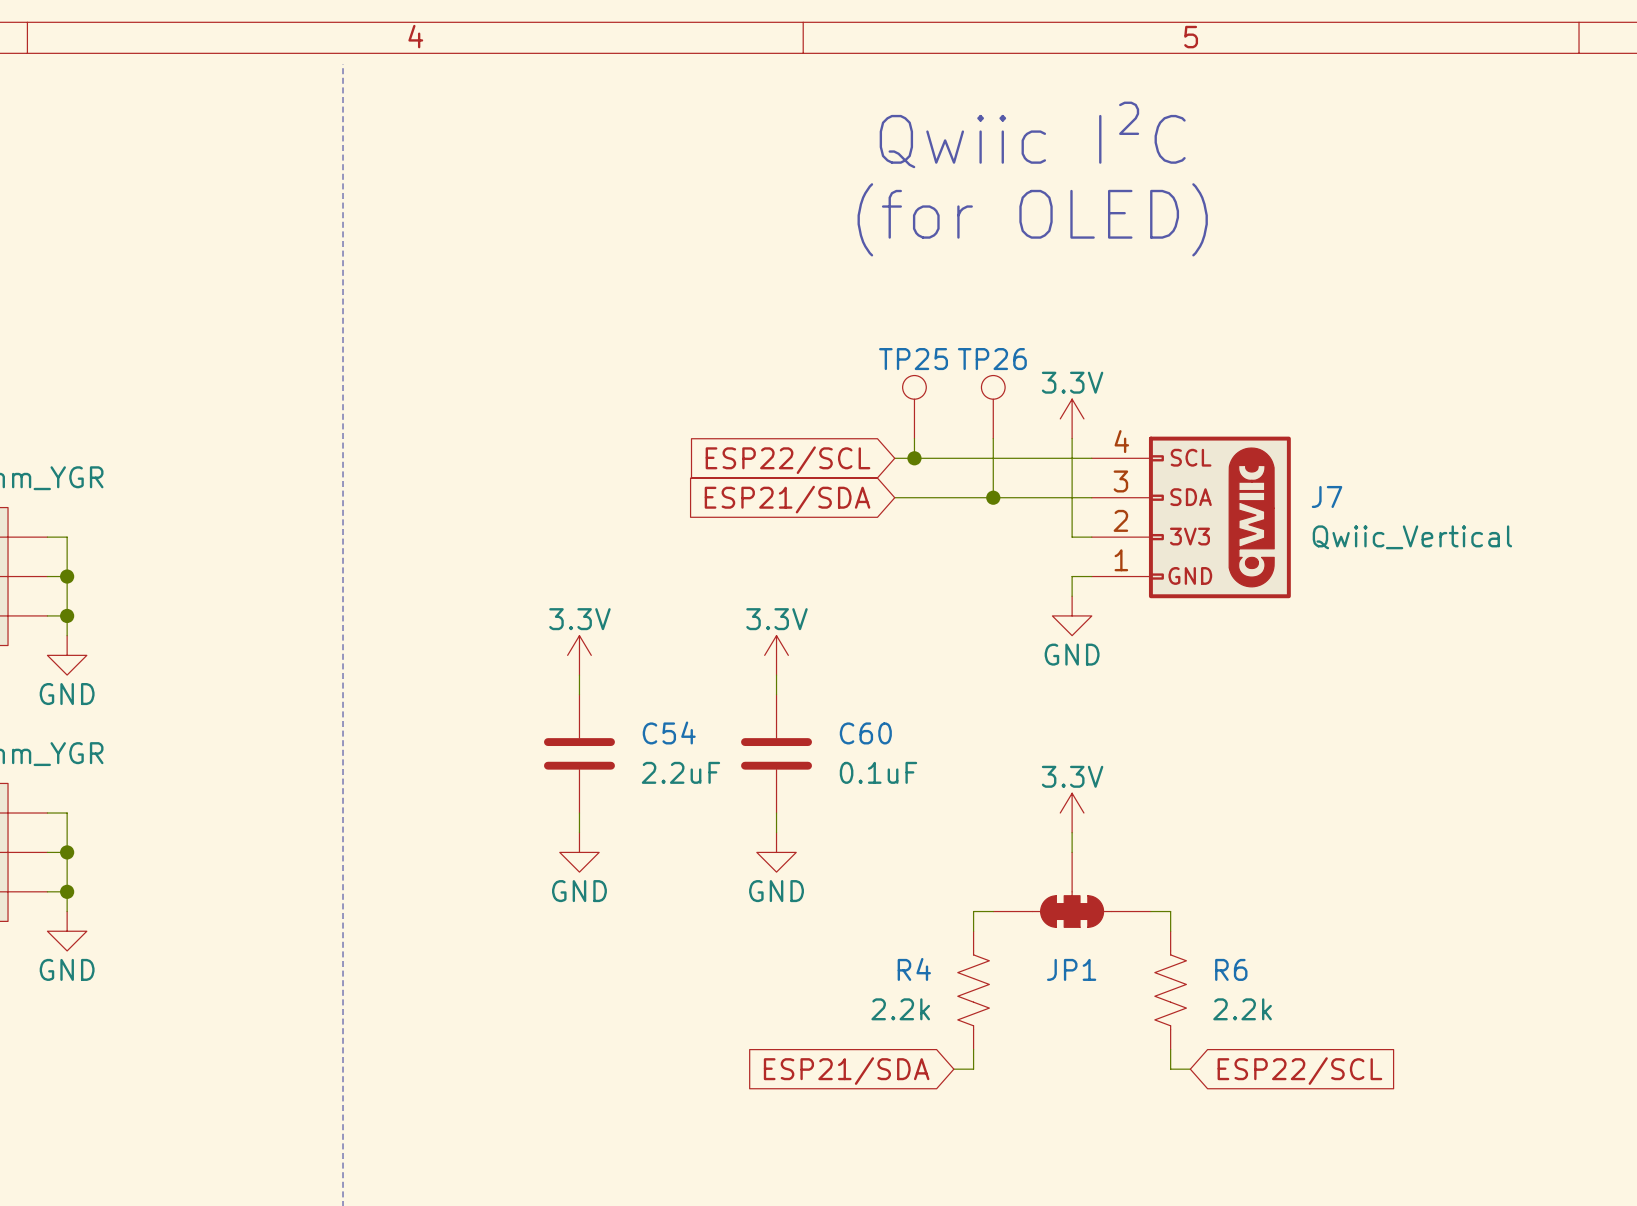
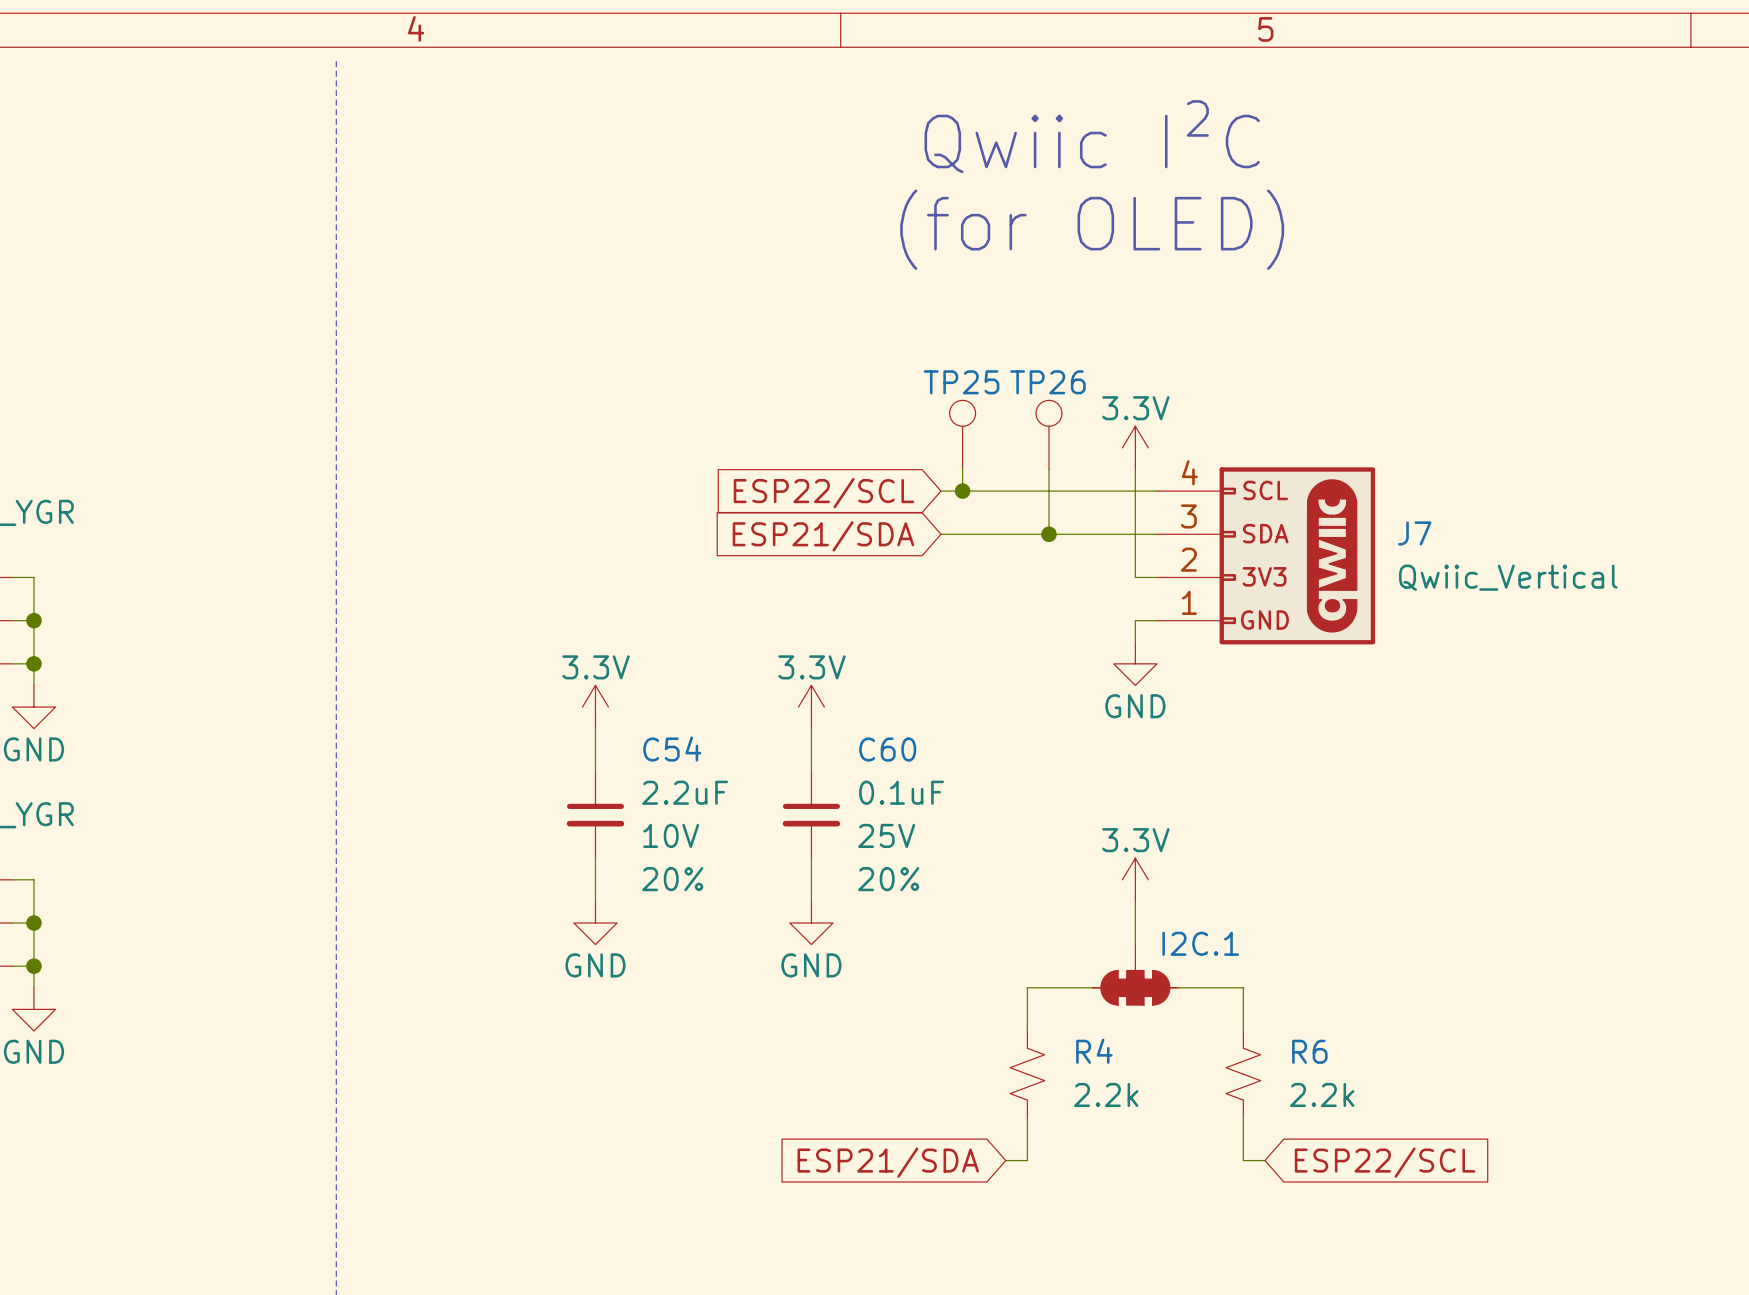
C54 symbol: [544, 694, 615, 814] -> [566, 771, 625, 859]
C60 symbol: [741, 694, 812, 814] -> [782, 771, 841, 859]
C54 name position: C54 (669, 732) -> C54 (672, 749)
C60 name position: C60 (865, 733) -> C60 (887, 749)
C54 text: none -> 10V (671, 835)
C54 value position: 2.2uF (680, 772) -> 2.2uF (685, 792)
C60 text: none -> 25V (886, 835)
C60 value position: 0.1uF (878, 772) -> 0.1uF (901, 792)
C54 text: none -> 20% (672, 879)
C60 text: none -> 20% (888, 879)
JP1: (1072, 889) -> none
I2C.1: none -> (1135, 974)
R4 symbol: [957, 931, 990, 1050] -> [1010, 1030, 1045, 1118]
R6 symbol: [1154, 931, 1187, 1050] -> [1226, 1030, 1261, 1118]
R4 name position: R4 (914, 969) -> R4 (1094, 1051)
R4 value position: 2.2k (900, 1009) -> 2.2k (1106, 1094)

